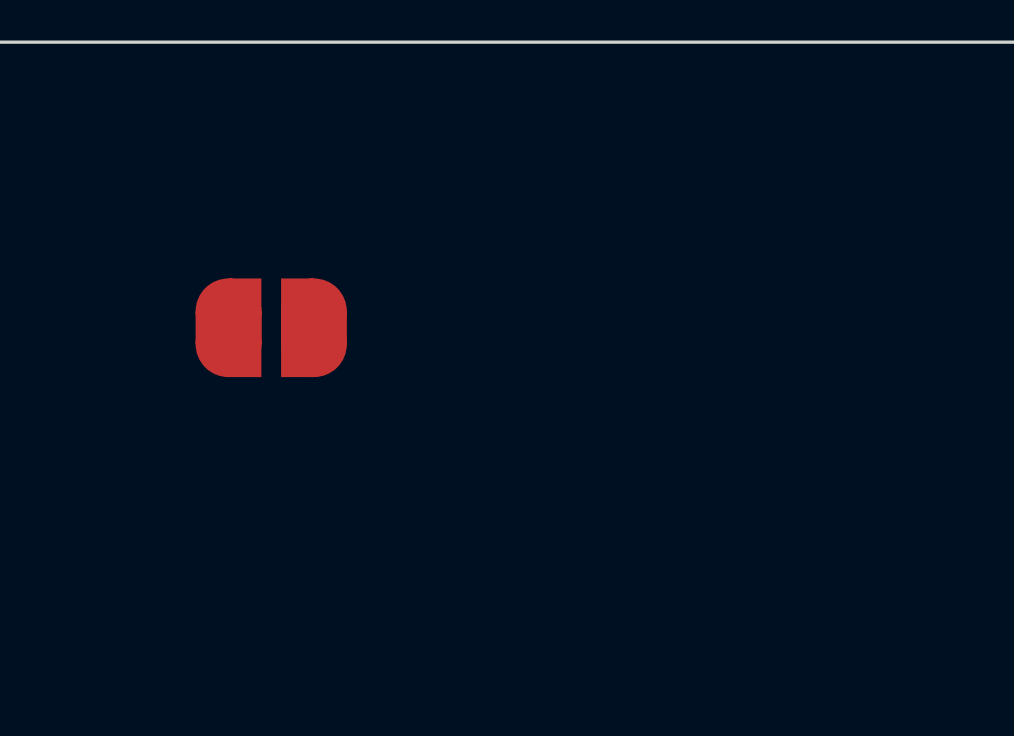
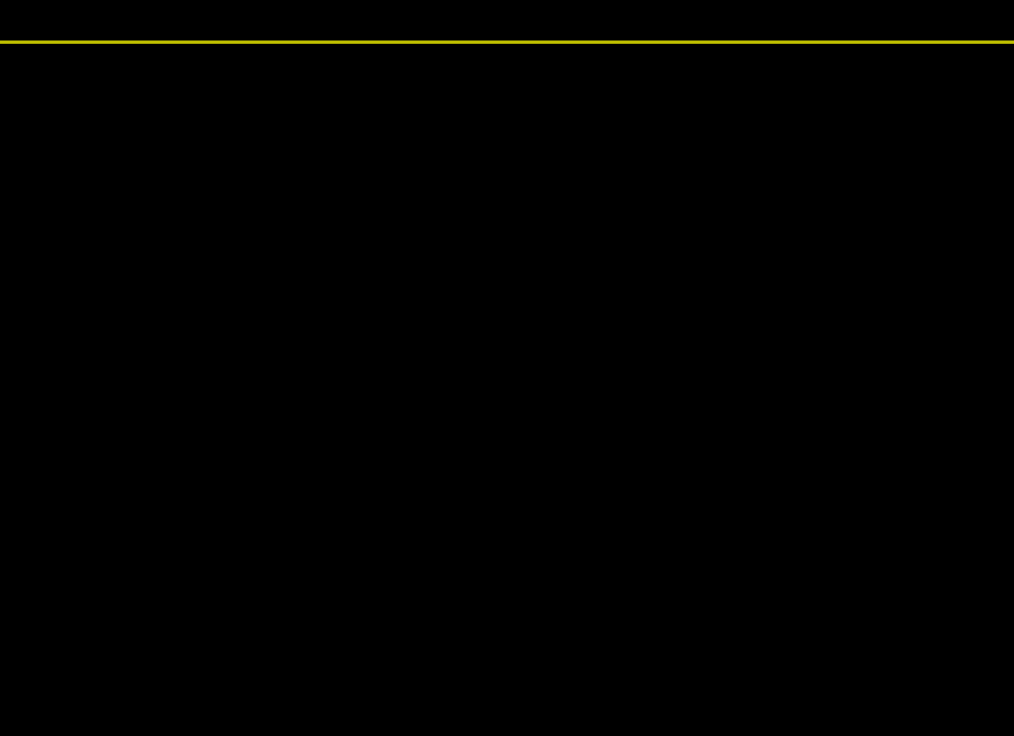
part: (271, 327) -> none

